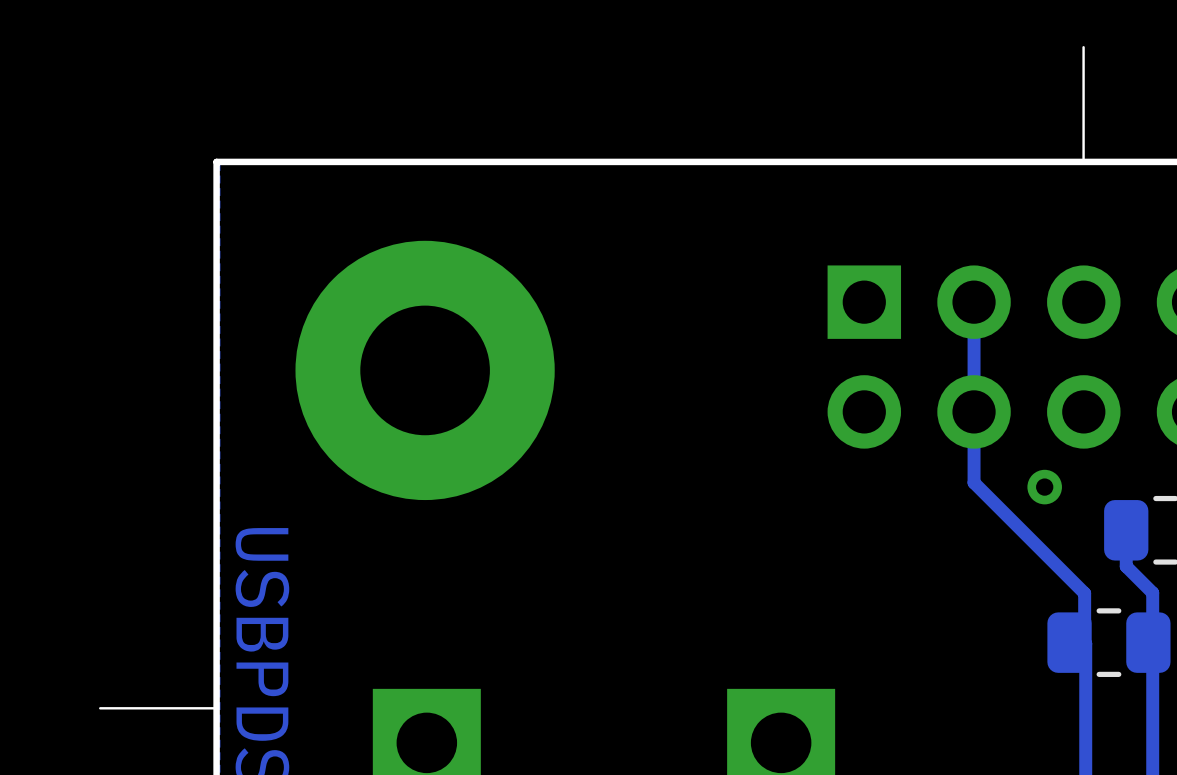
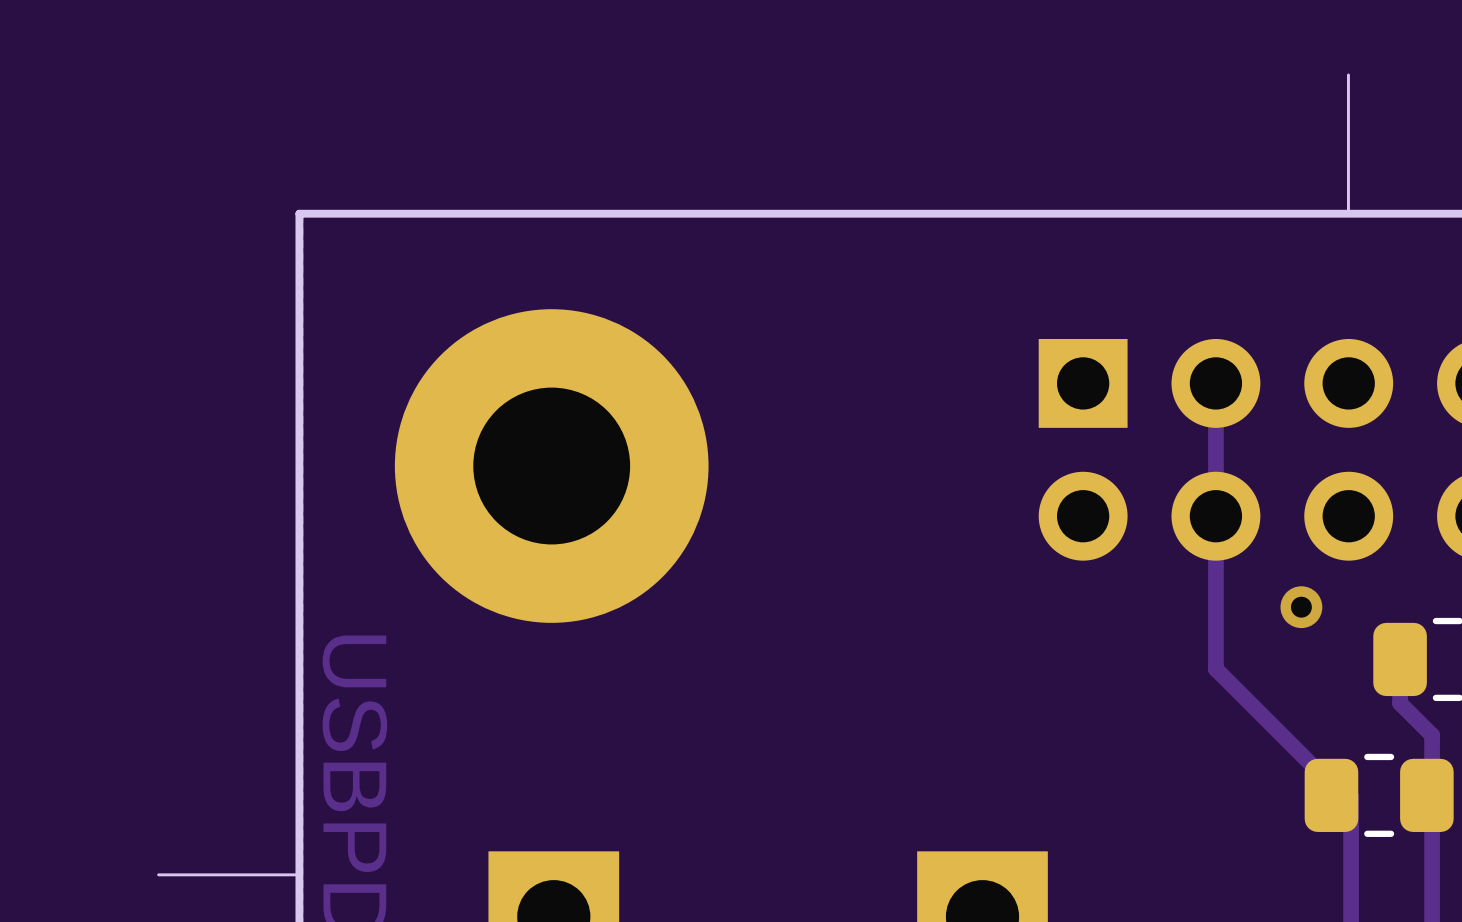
track: (974, 482) (1084, 593) (1084, 642) -> (1215, 601) (1215, 669) (1342, 795) (1349, 795)

